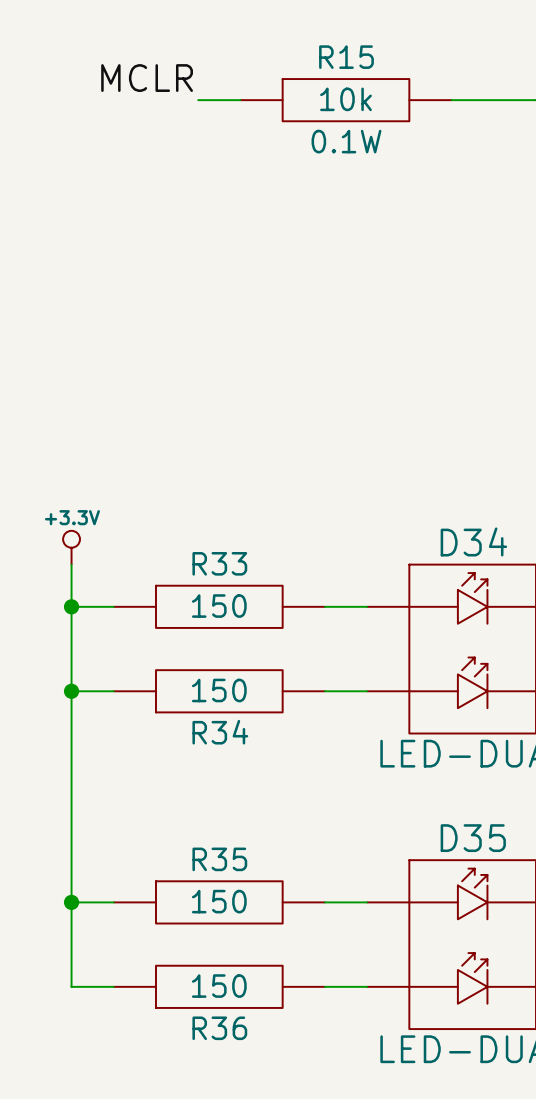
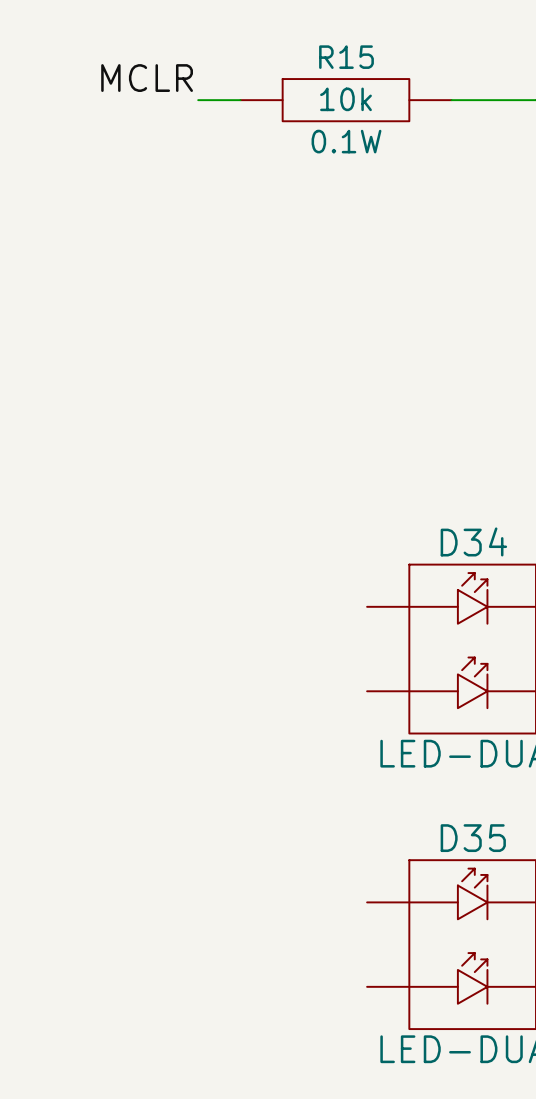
power symbol: +3.3V (71, 547) -> none
wire: (71, 564) (71, 986) (113, 986) -> none
wire: (71, 606) (113, 606) -> none
junction: (71, 606) -> none
R33: 150 (219, 606) -> none
wire: (324, 606) (367, 606) -> none
wire: (71, 691) (113, 691) -> none
junction: (71, 691) -> none
R34: 150 (219, 691) -> none
wire: (324, 691) (367, 691) -> none
wire: (71, 902) (113, 902) -> none
junction: (71, 902) -> none
R35: 150 (219, 902) -> none
wire: (324, 902) (367, 902) -> none
R36: 150 (219, 986) -> none
wire: (324, 986) (367, 986) -> none

